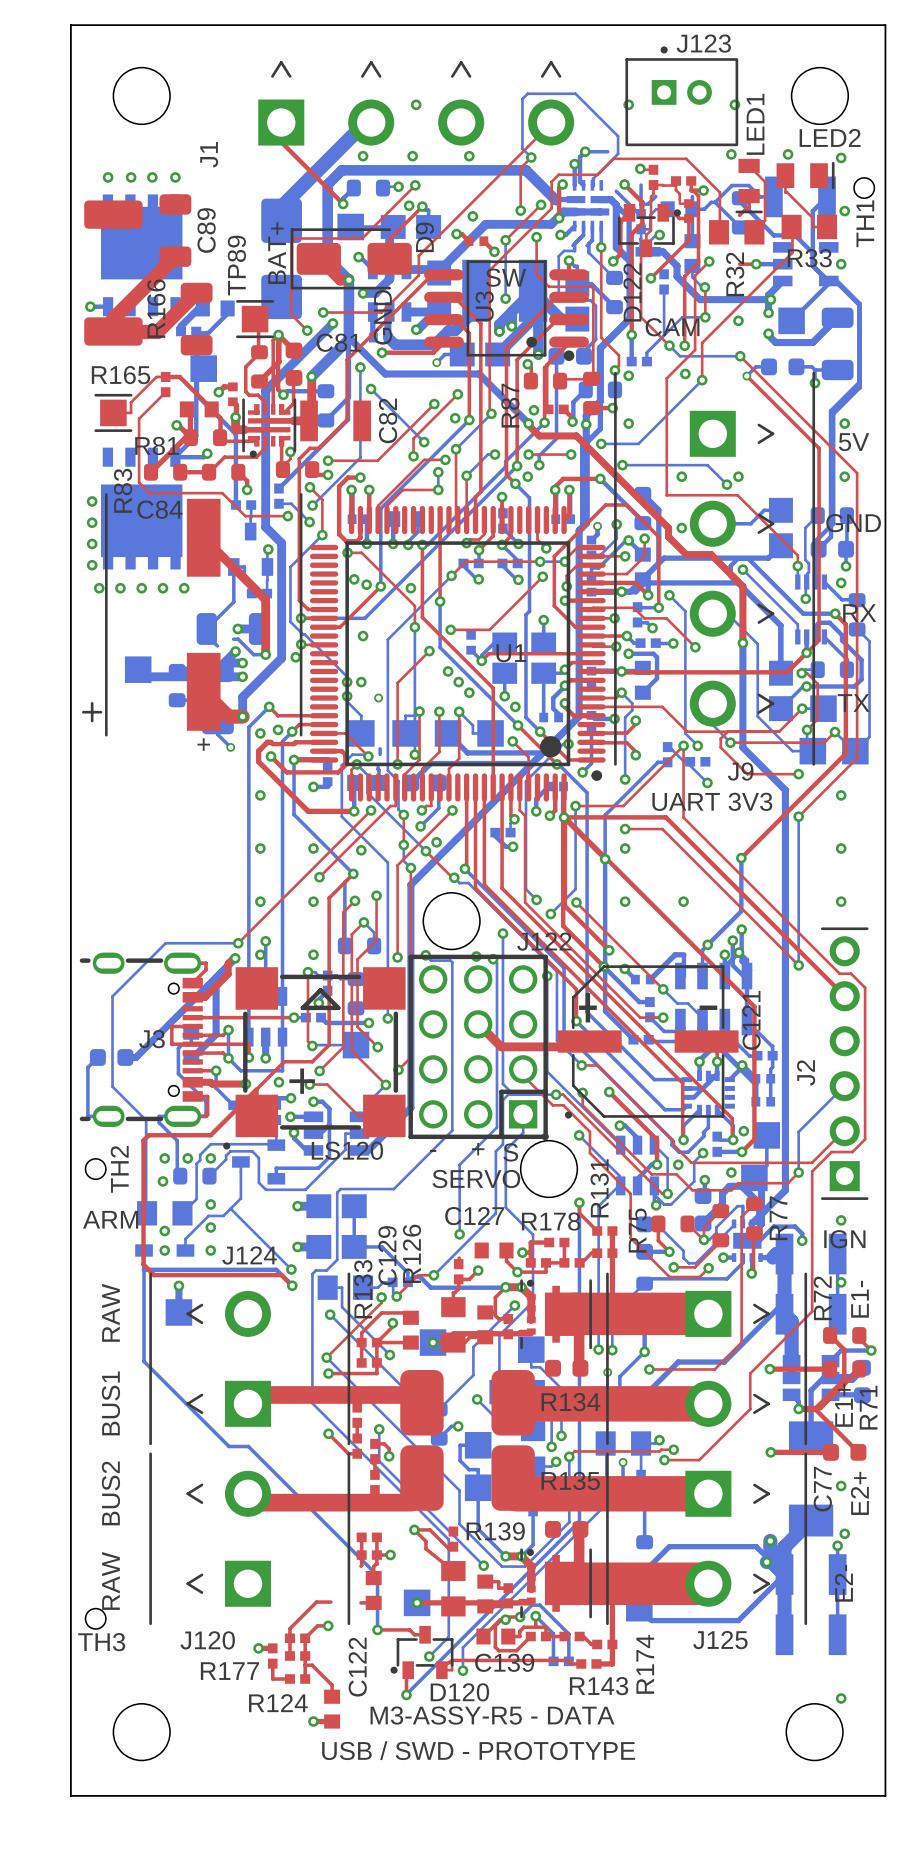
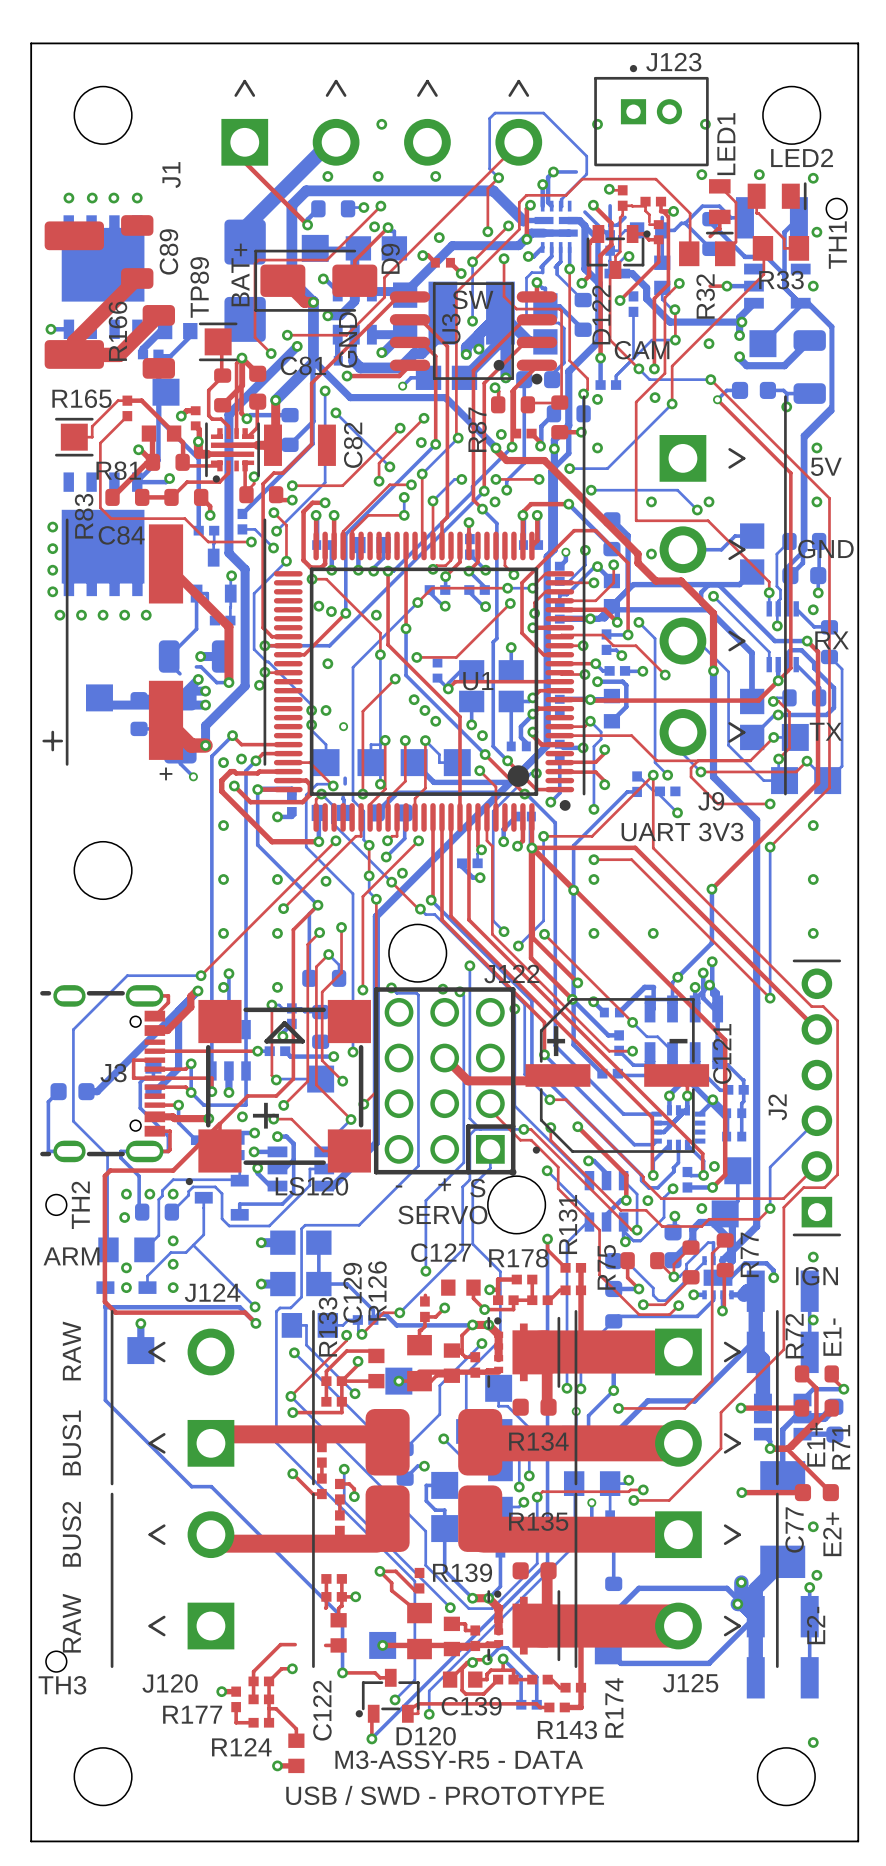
round board edge: none -> [73, 841, 133, 900]

